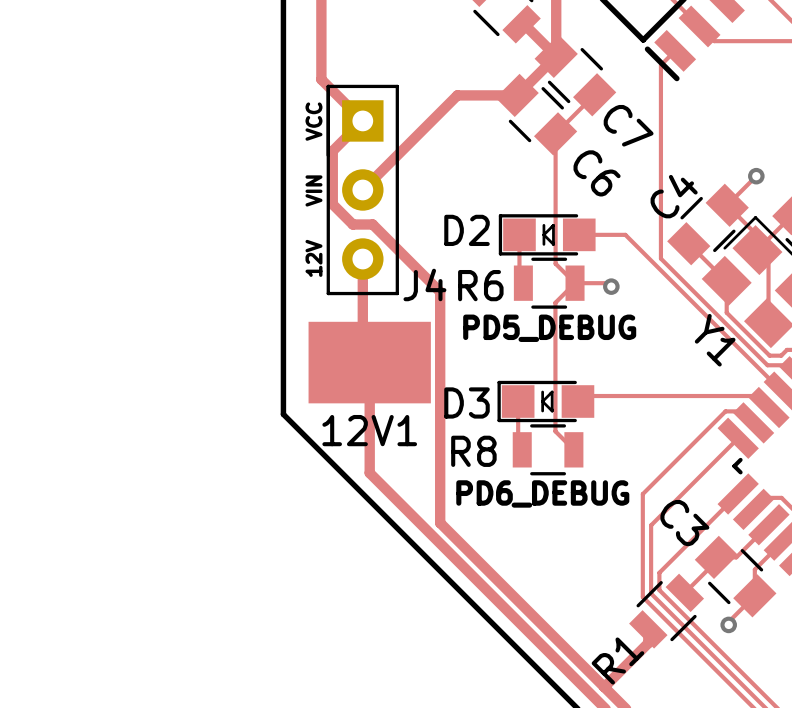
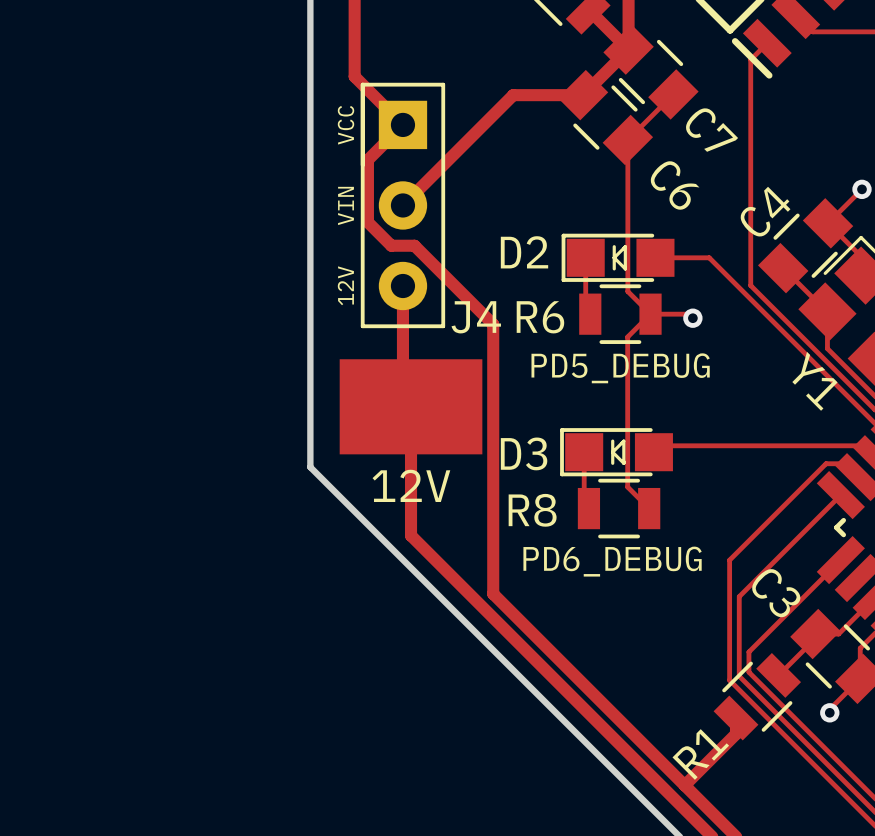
12V1 name: 12V1 (369, 430) -> 12V (411, 485)

